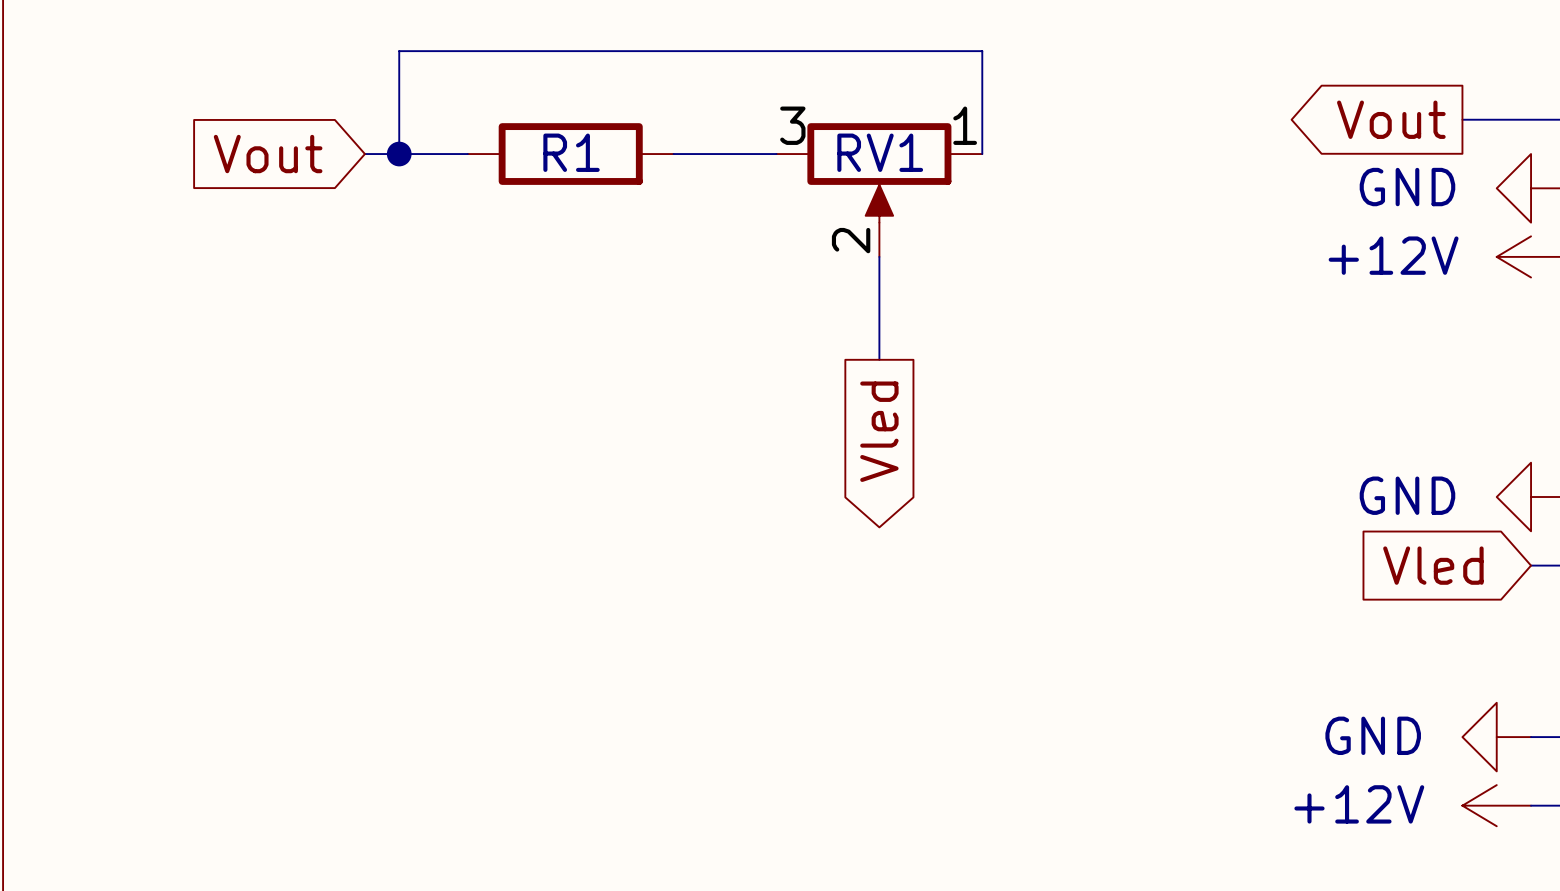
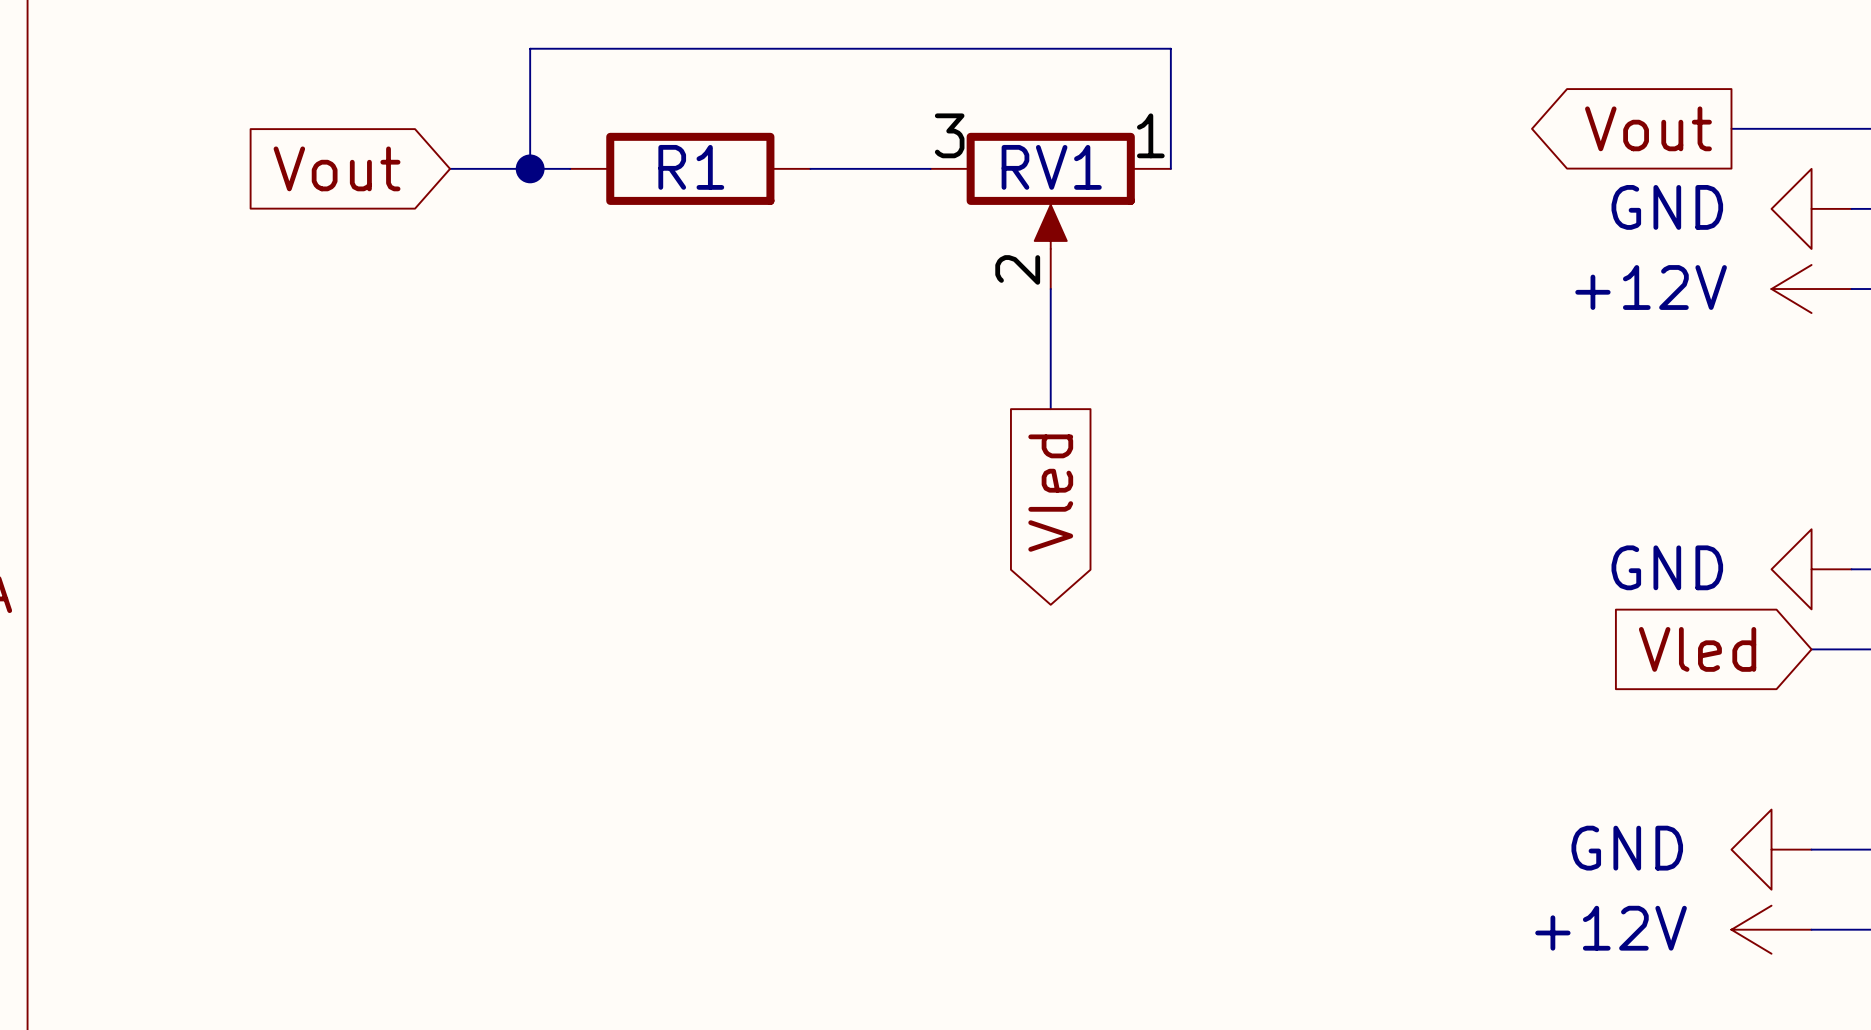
wire: (433, 51) (399, 51) (399, 154) -> (530, 48) (530, 168)
junction position: (399, 154) -> (530, 168)

